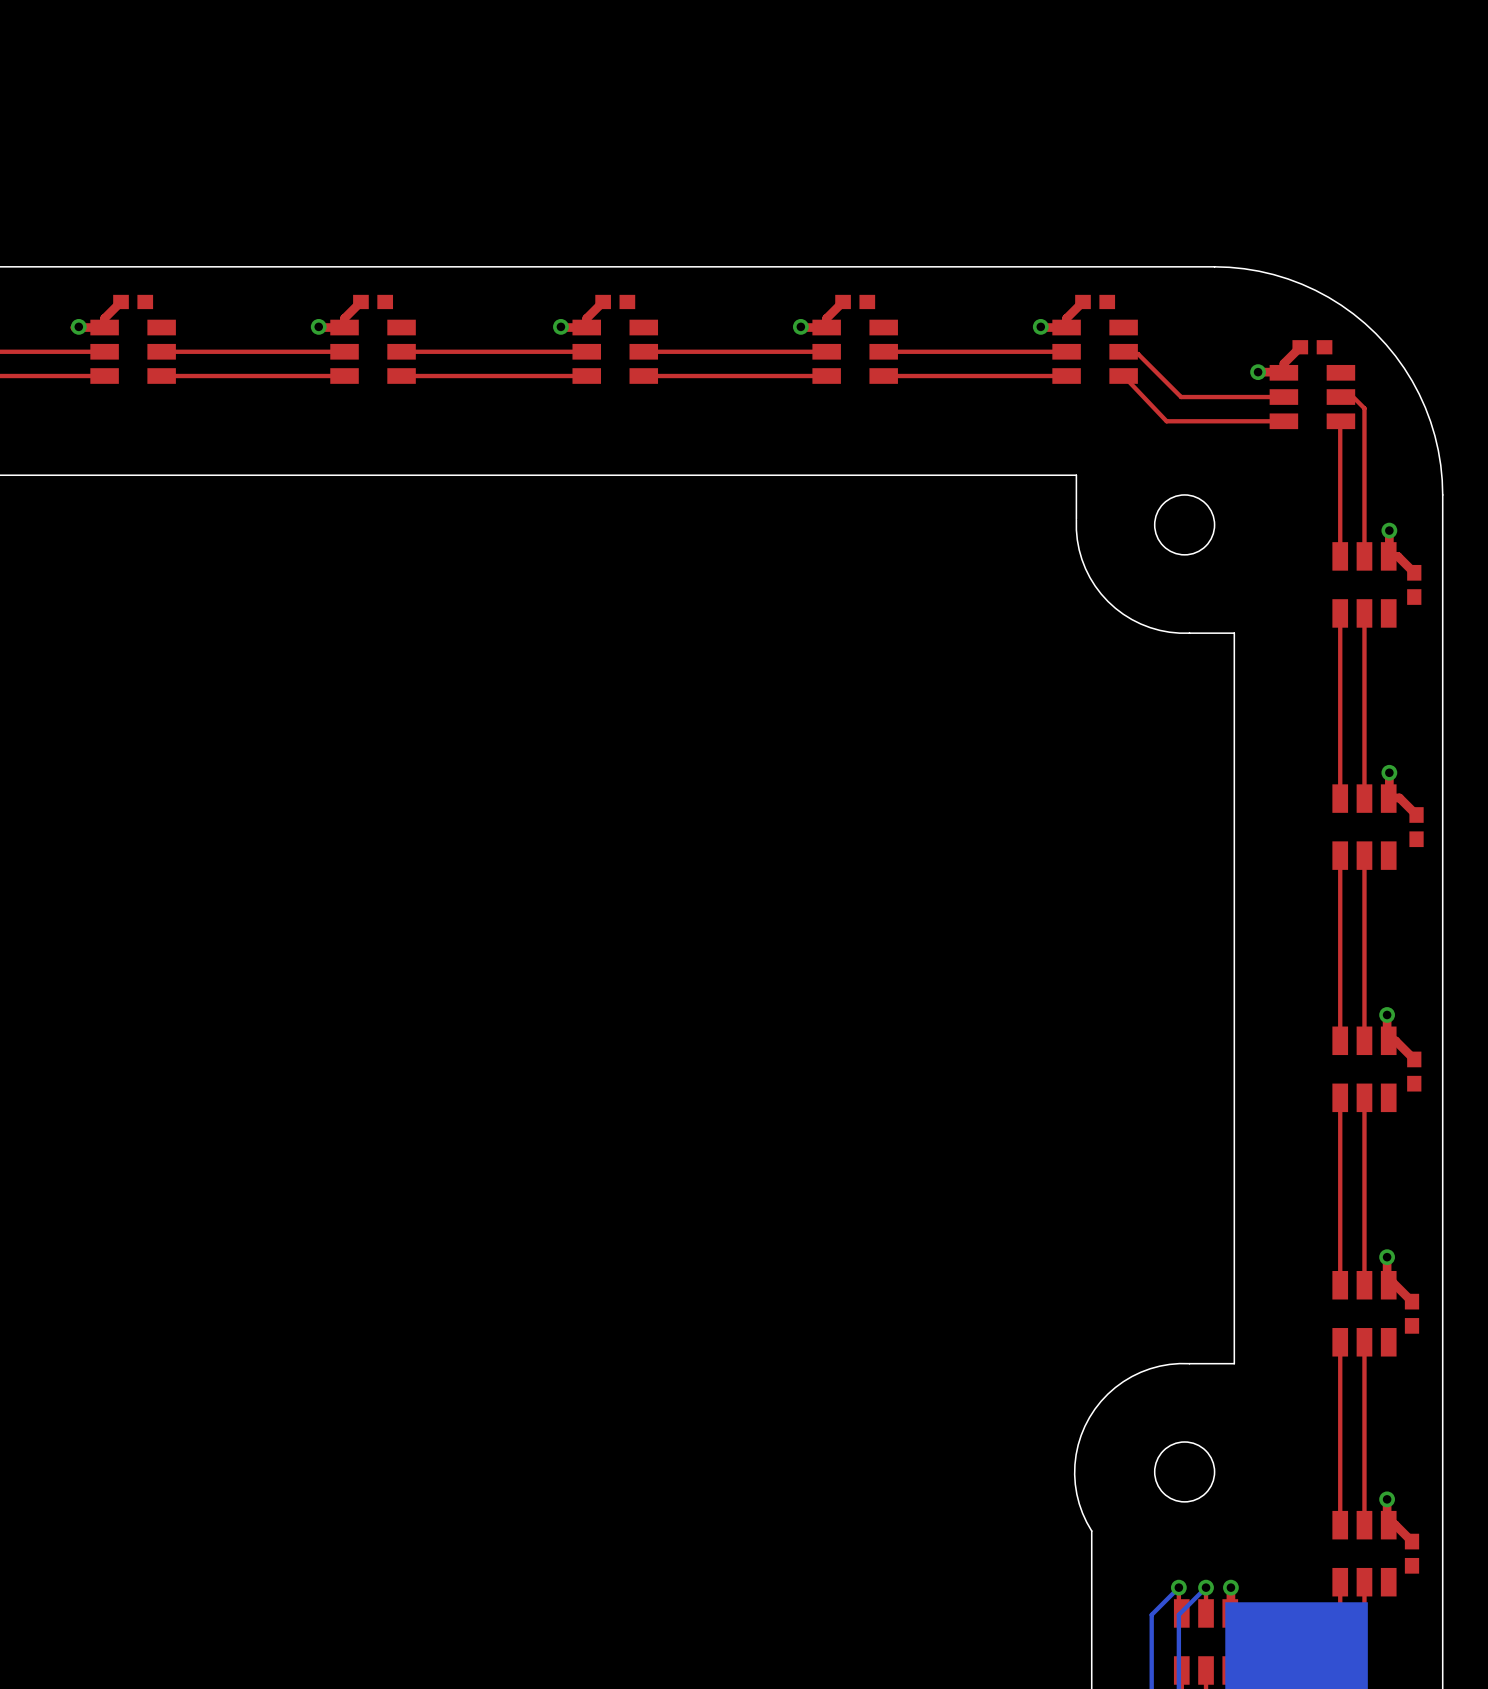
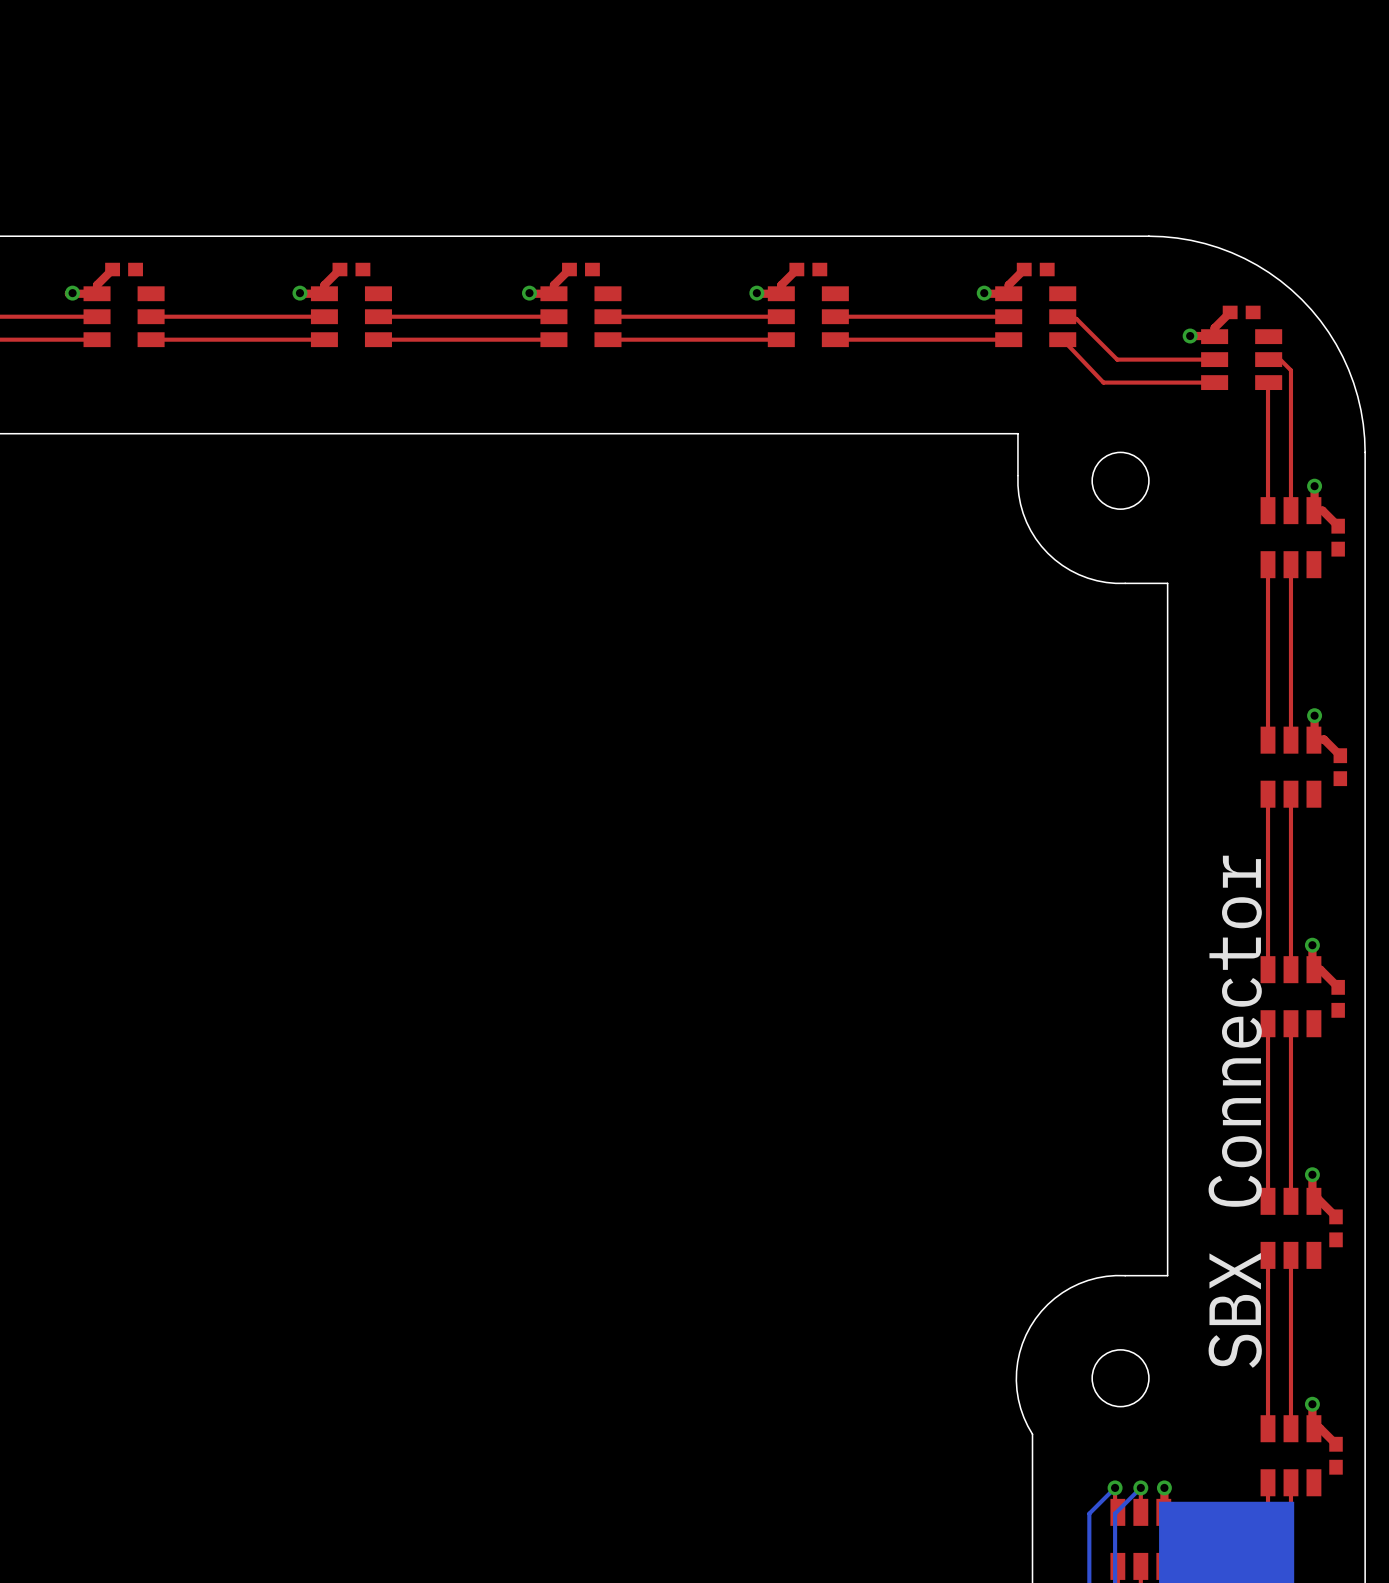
text: none -> SBX Connector (1235, 1111)

